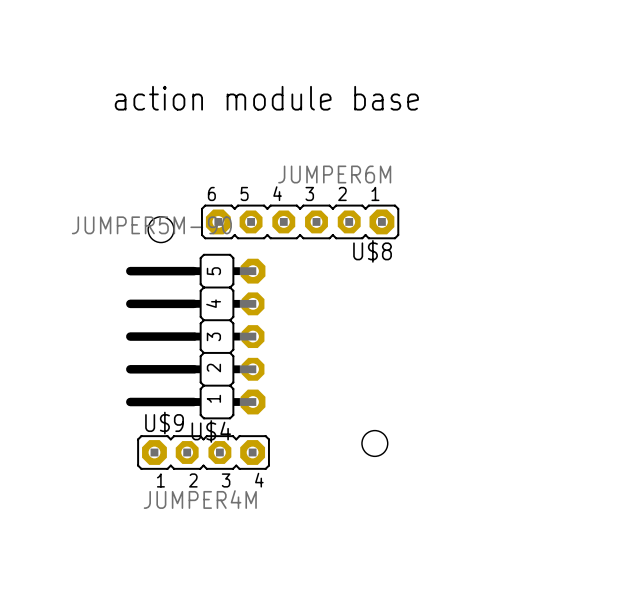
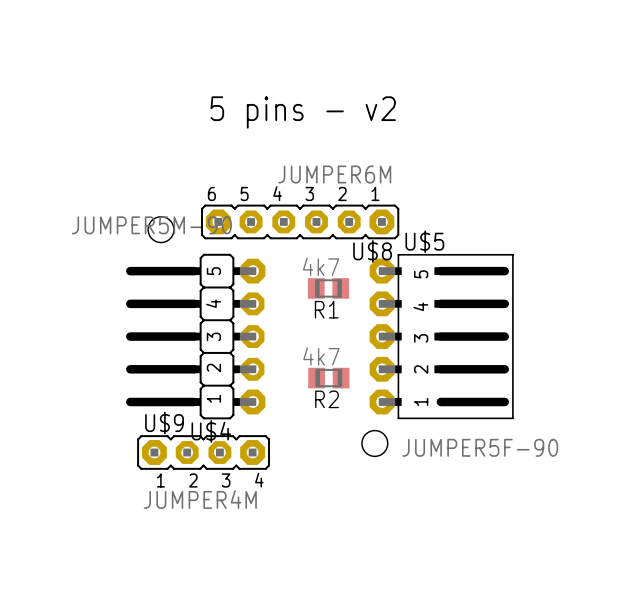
text: action module base (266, 98) -> none
text: none -> 5 pins - v2 (303, 112)
R1: none -> 4k7 (328, 288)
U$5: none -> JUMPER5F-90 (441, 336)
R2: none -> 4k7 (328, 378)

